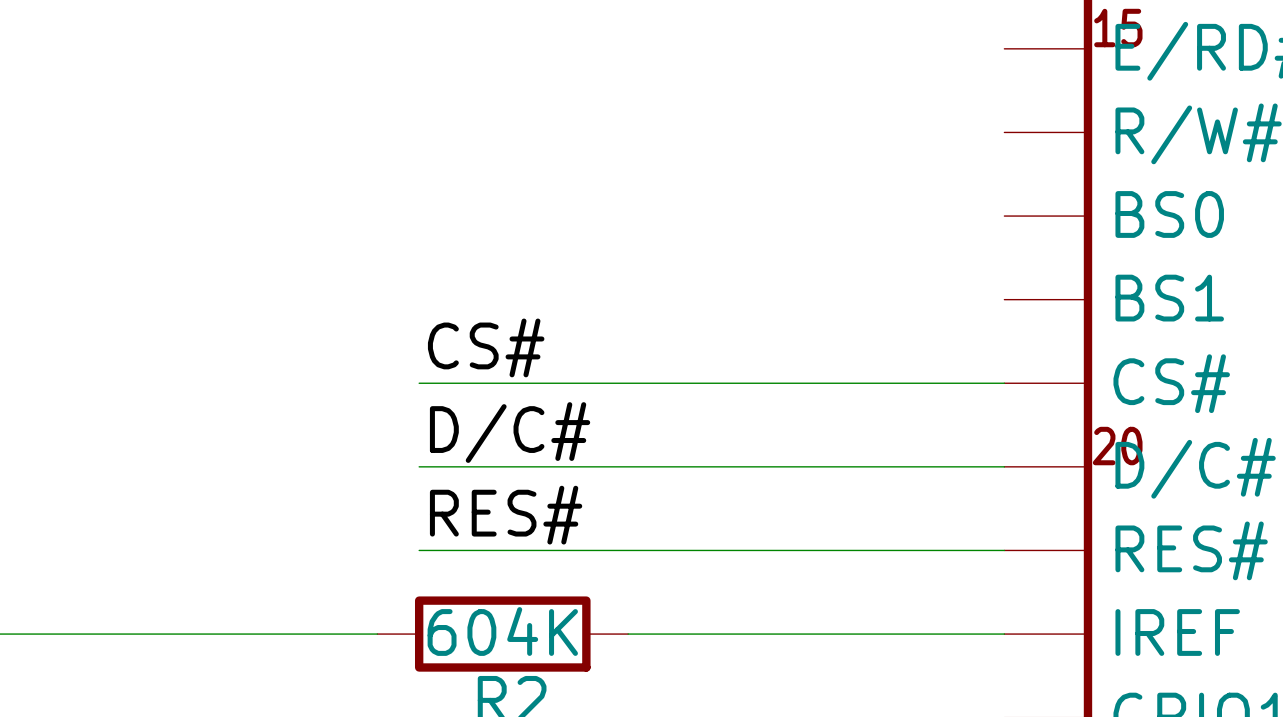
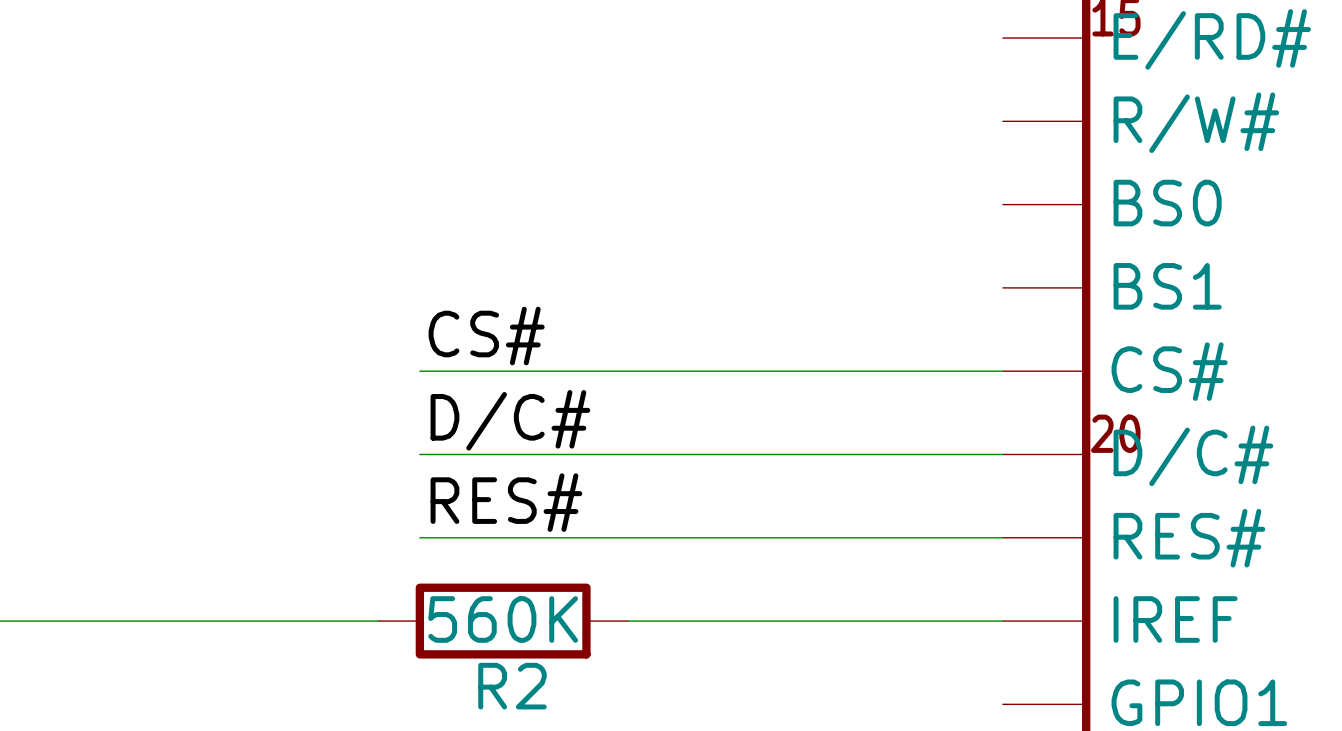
R2 value: 604K (502, 631) -> 560K (503, 619)

